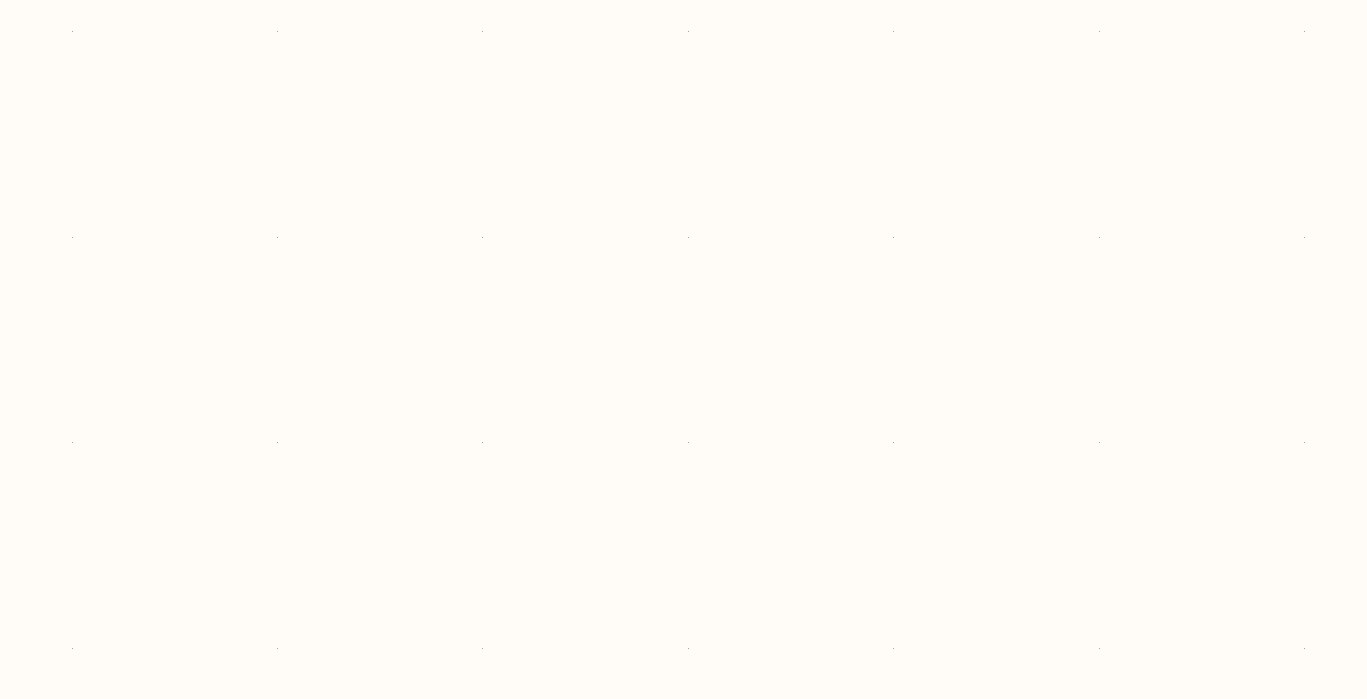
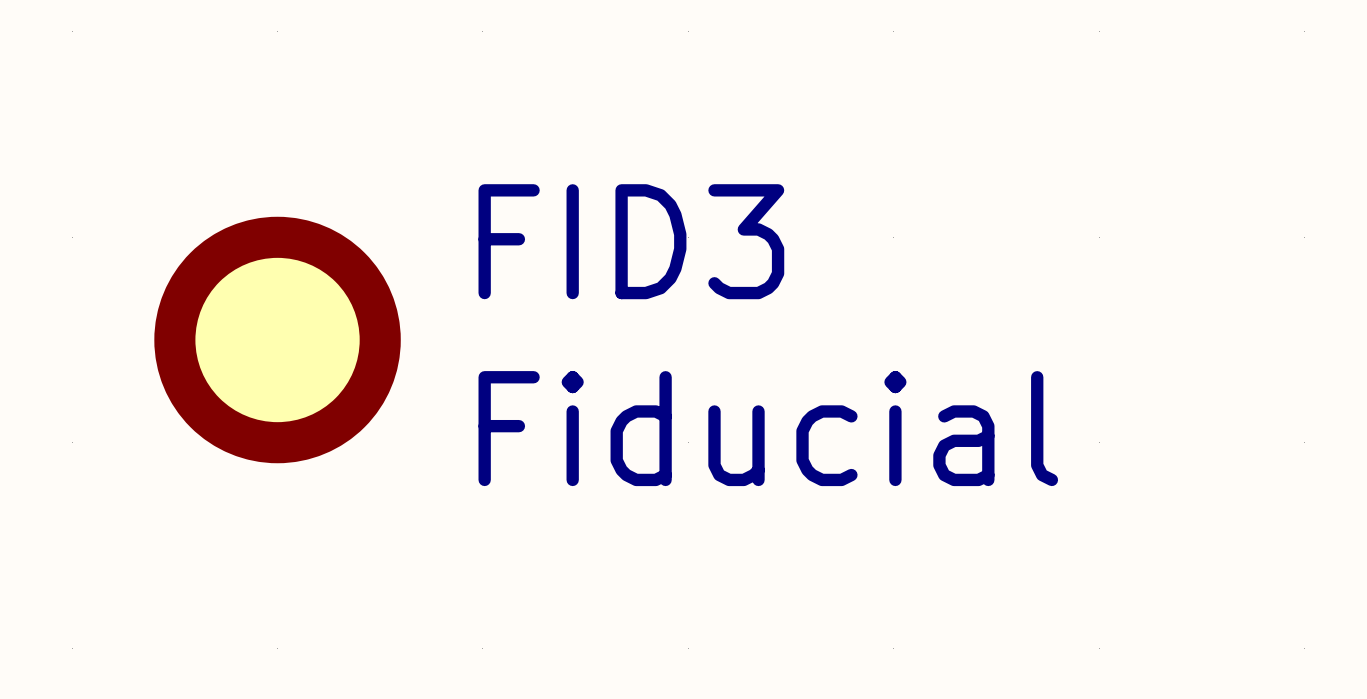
FID3: none -> Fiducial (277, 340)

